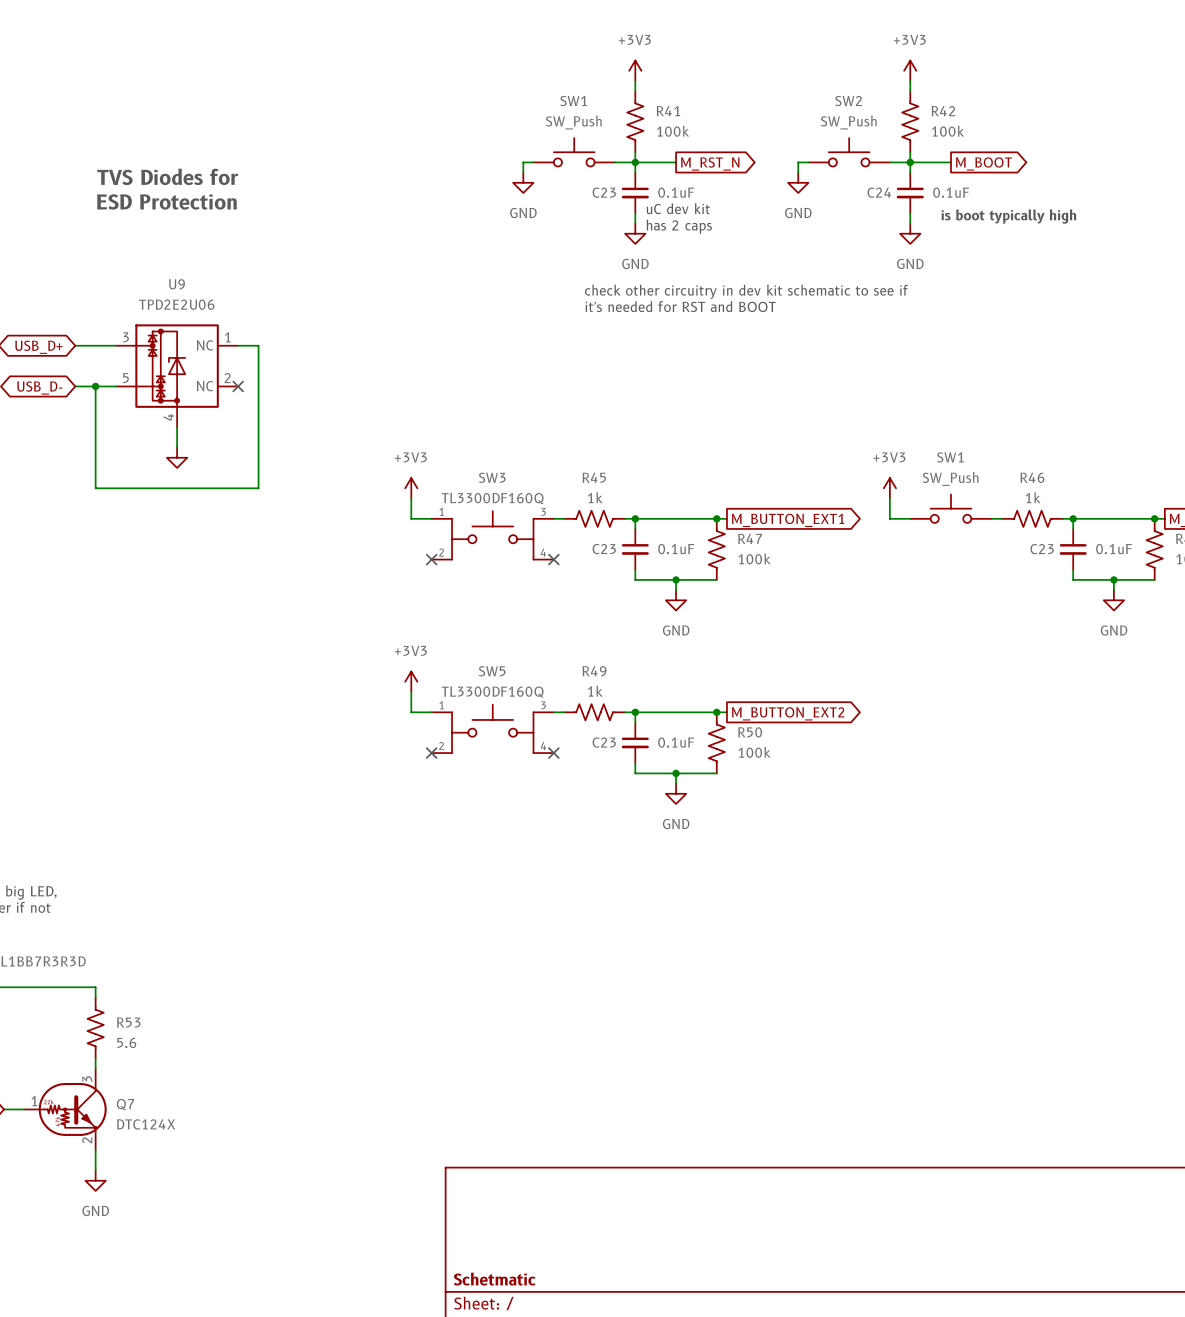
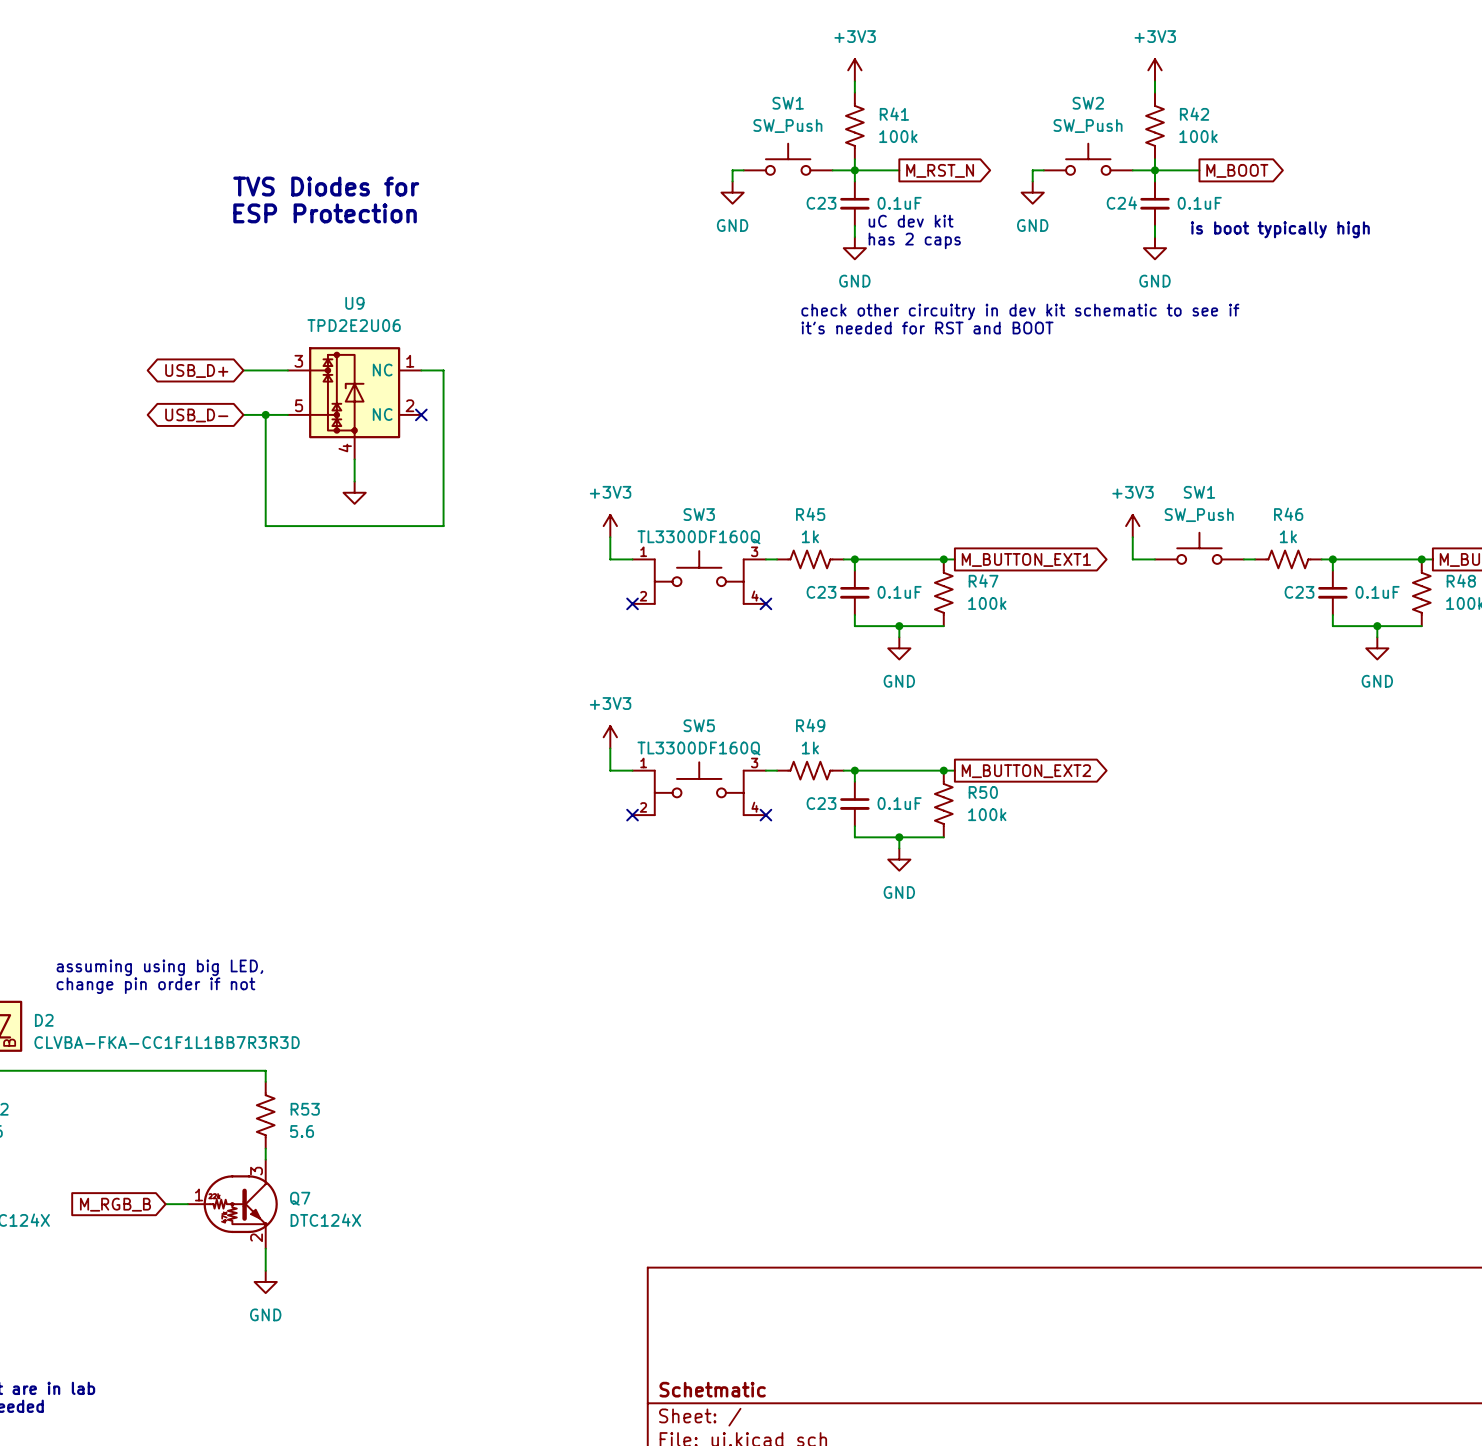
text: ESD Protection (166, 201) -> ESP Protection (325, 213)

